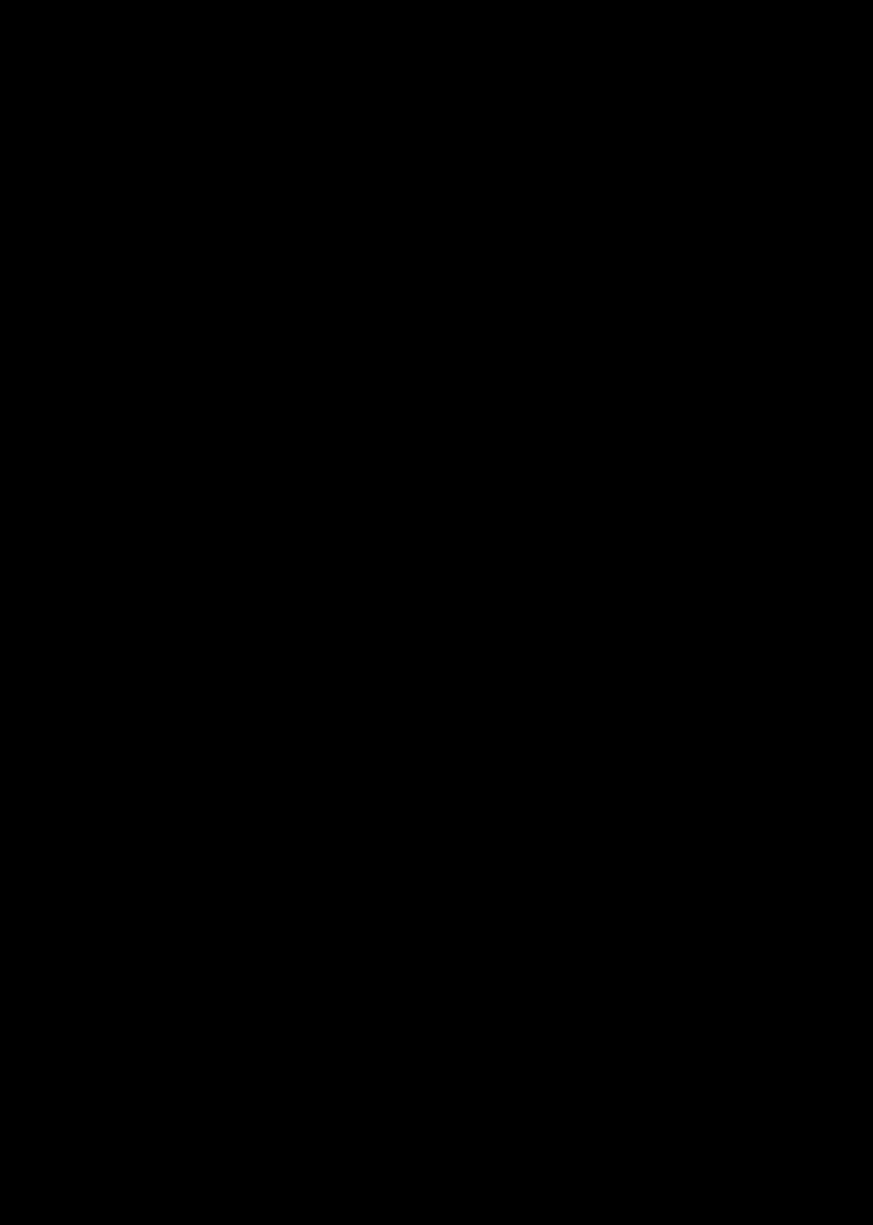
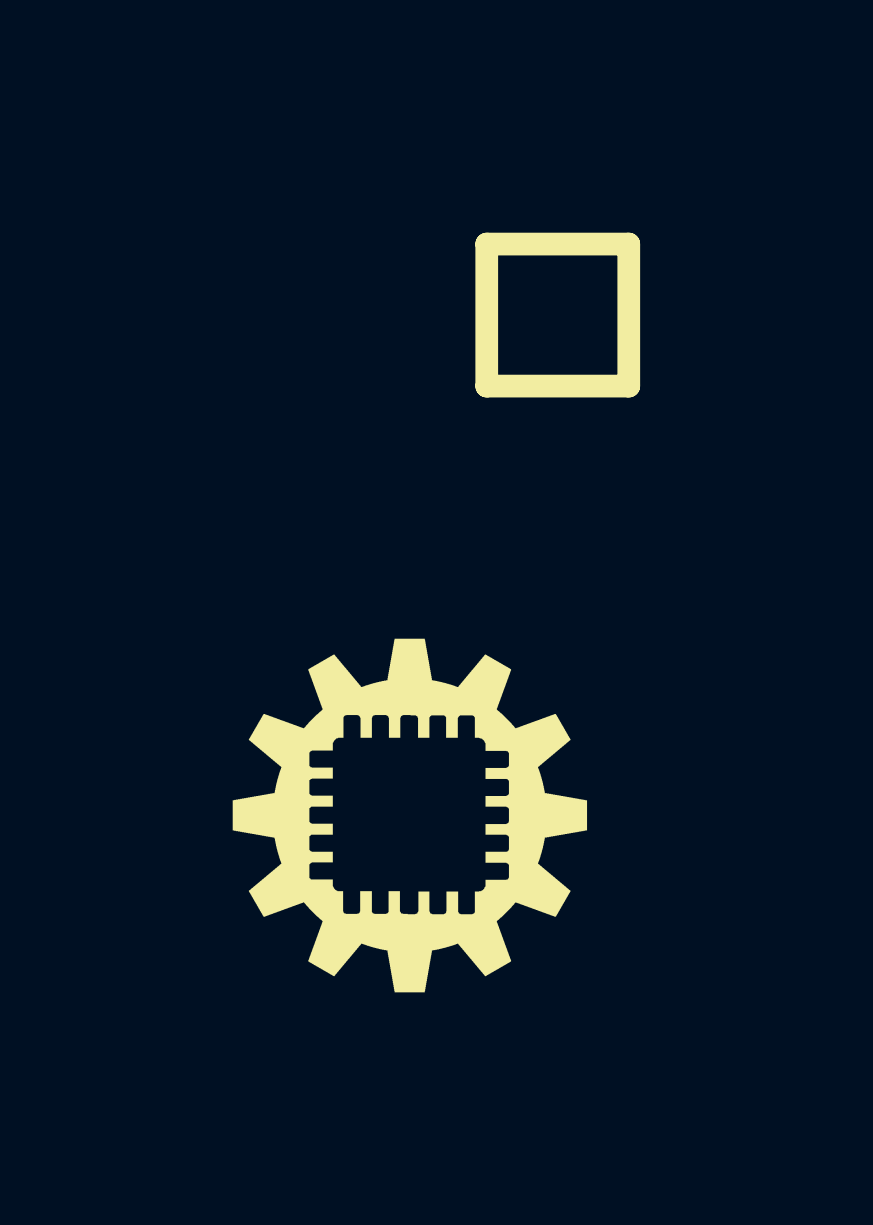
line: none -> (486, 244) (628, 244) (628, 386) (486, 386) (486, 244)
drawing: none -> [232, 638, 588, 993]

